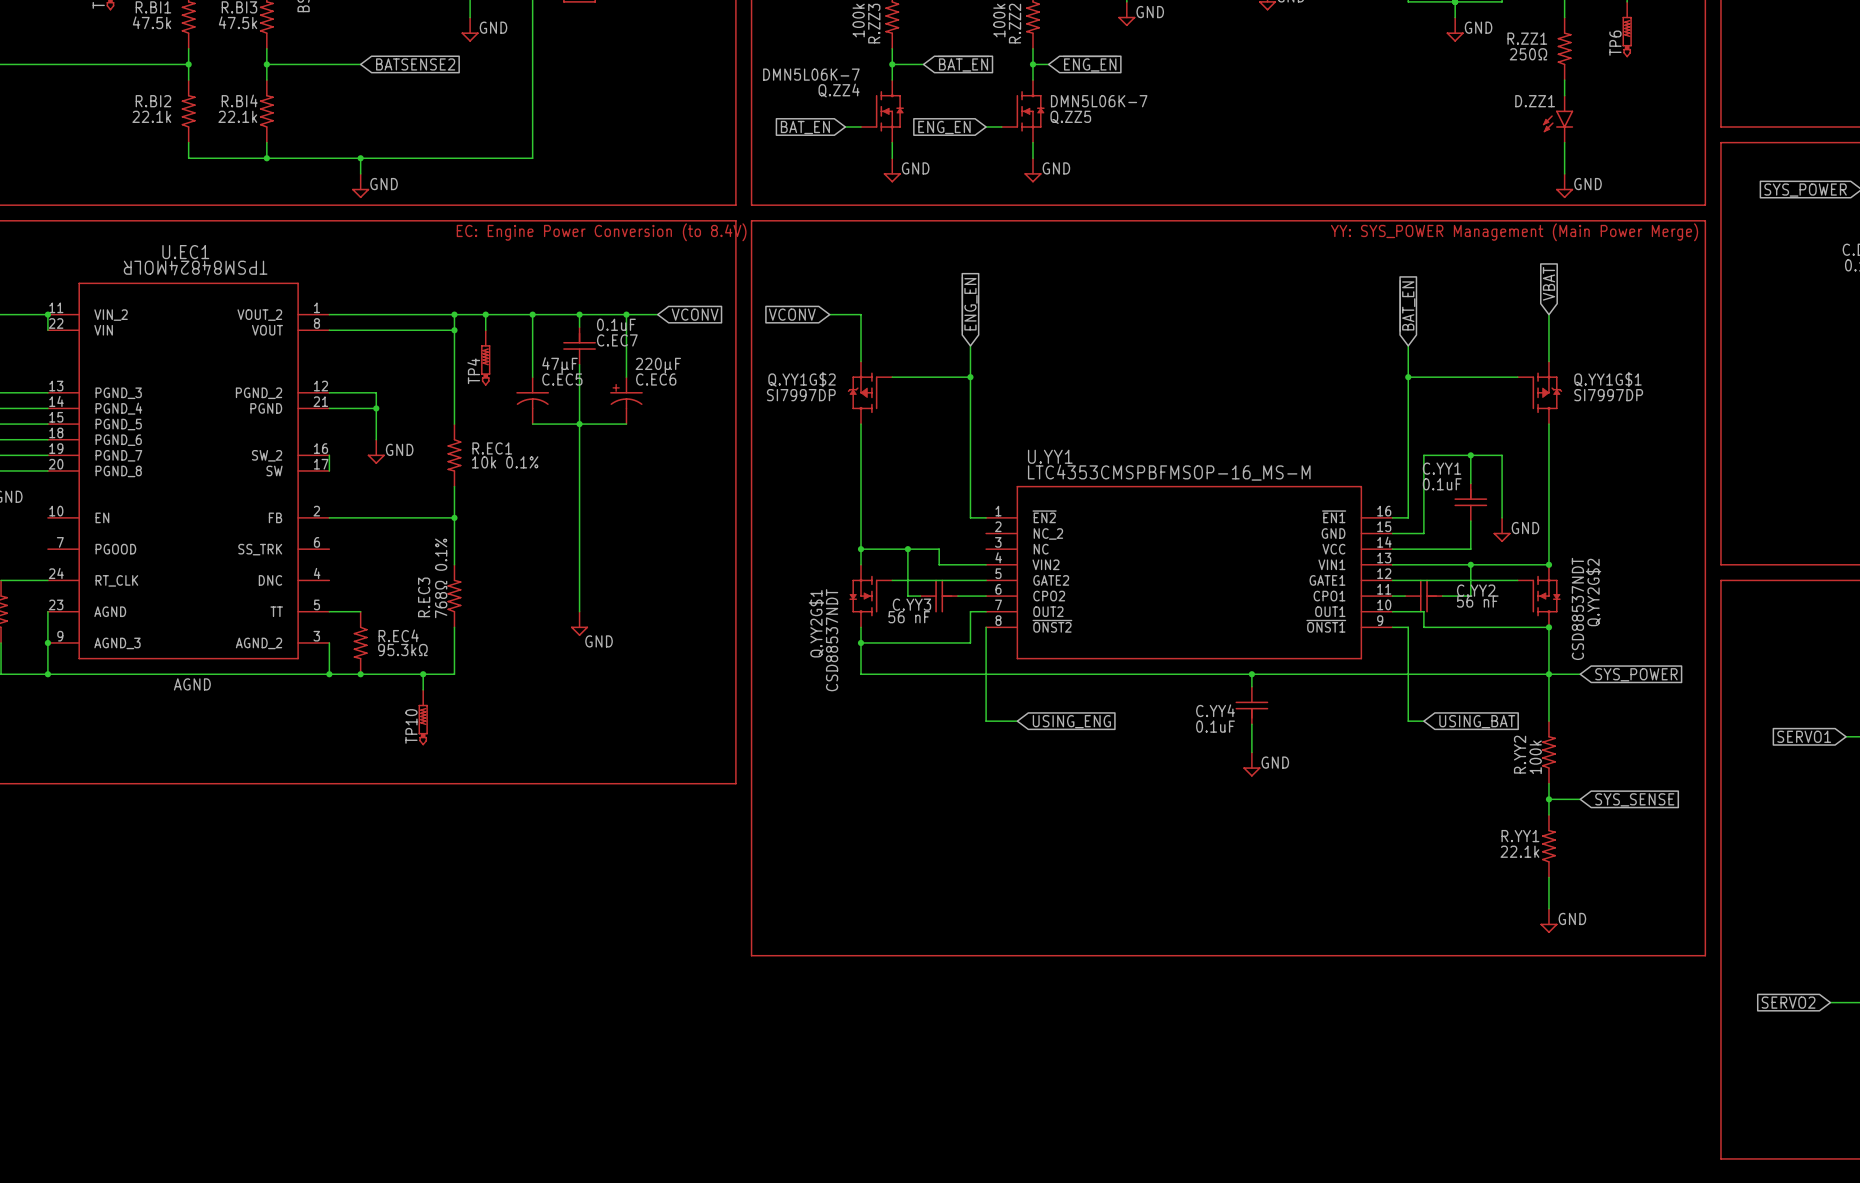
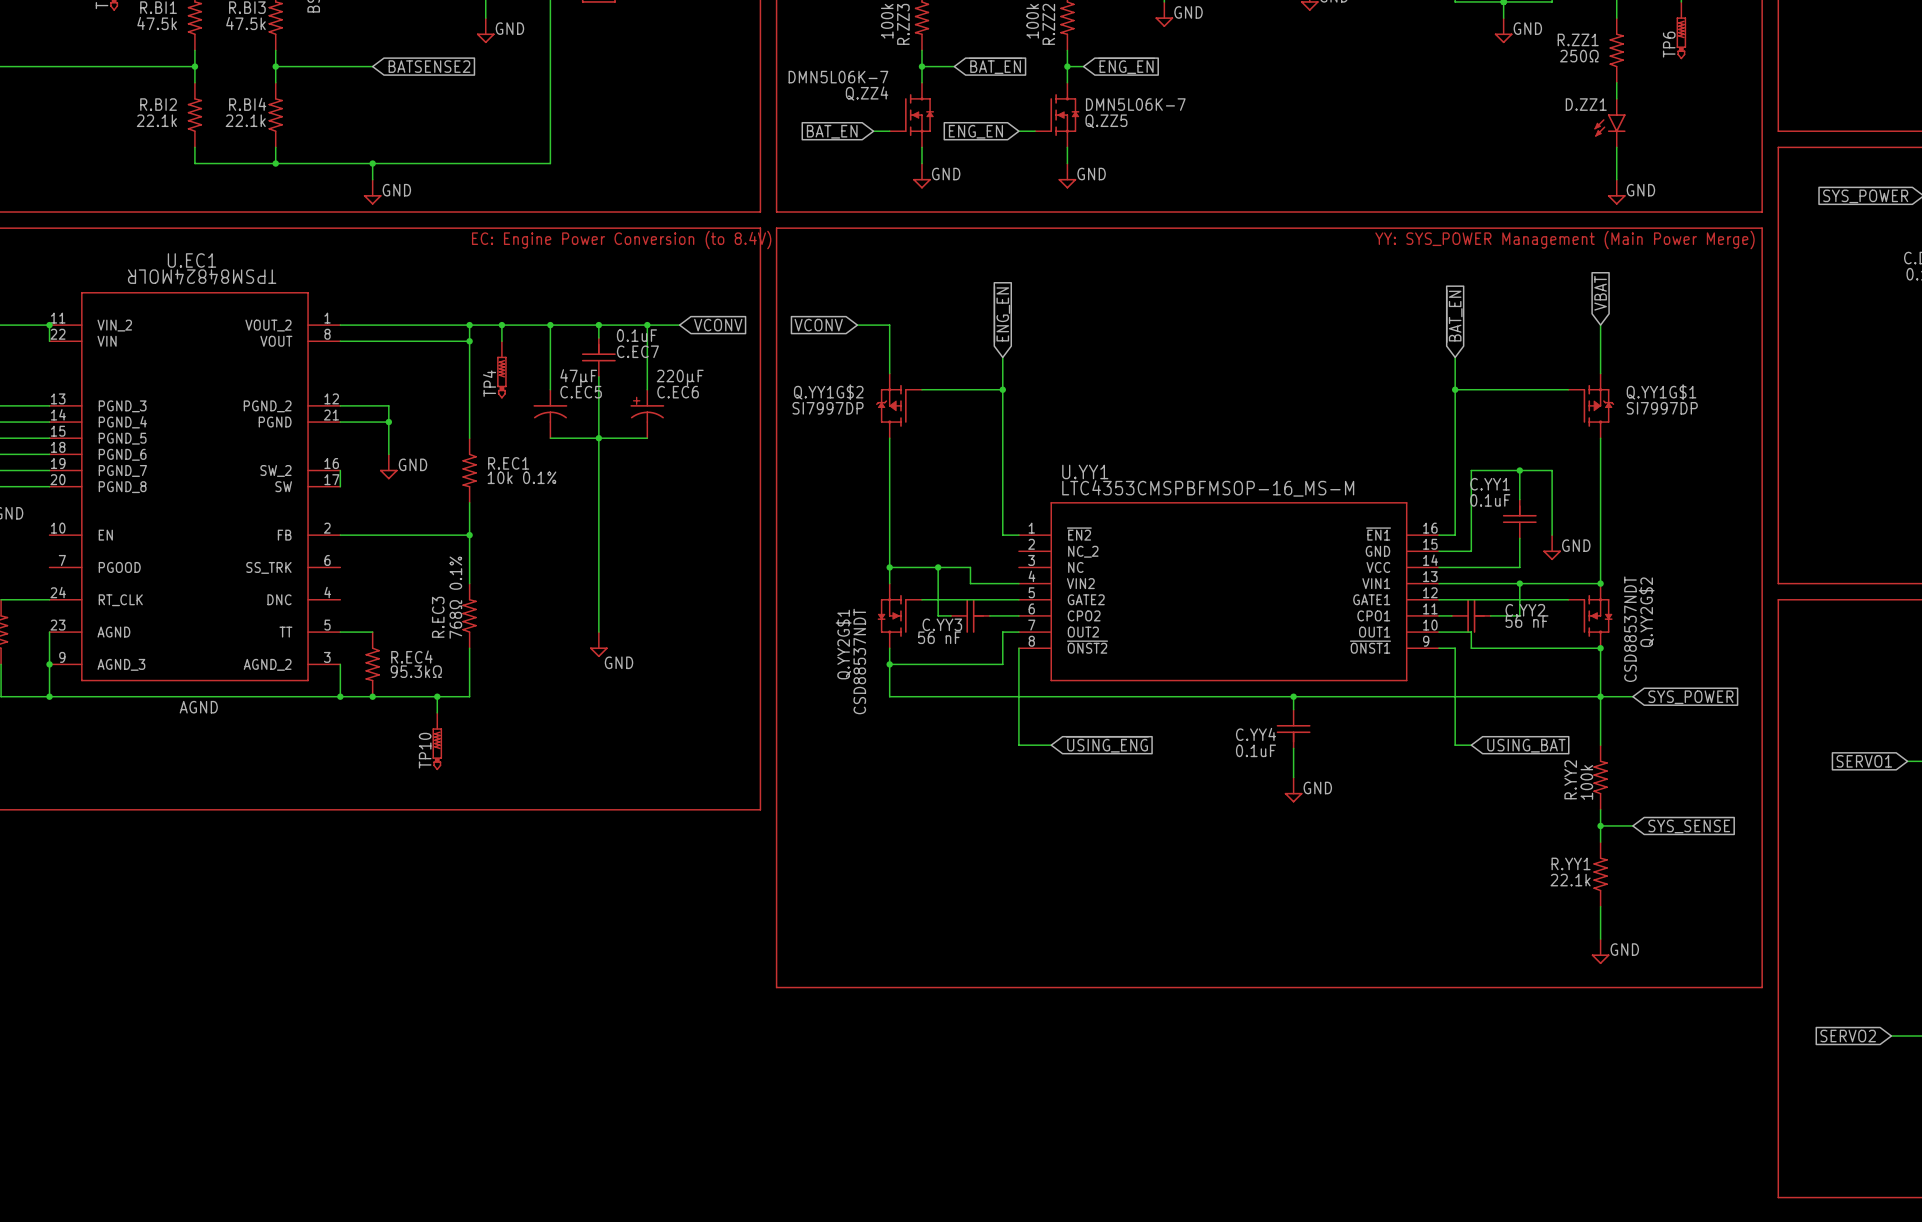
global label: USING_ENG (1071, 721) -> ~{USING_ENG} (1107, 744)

